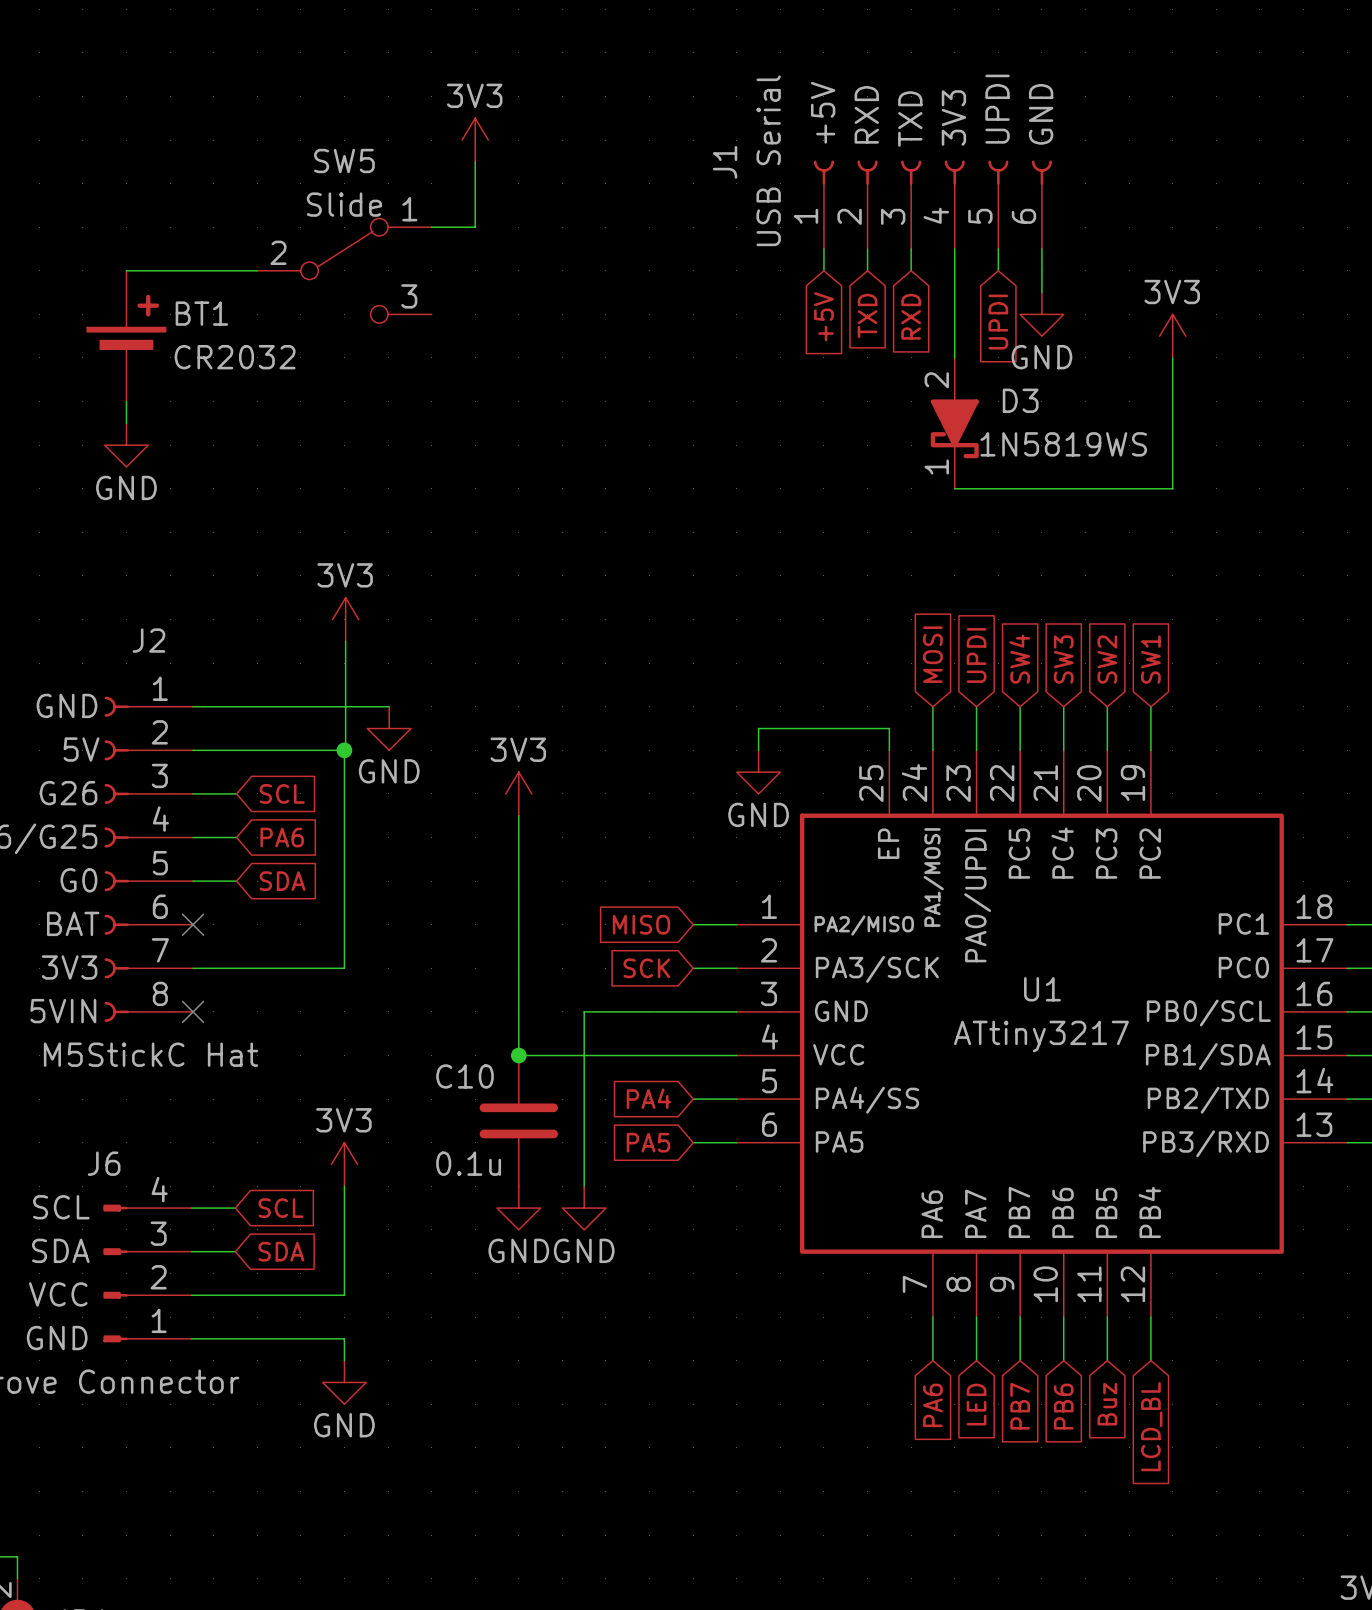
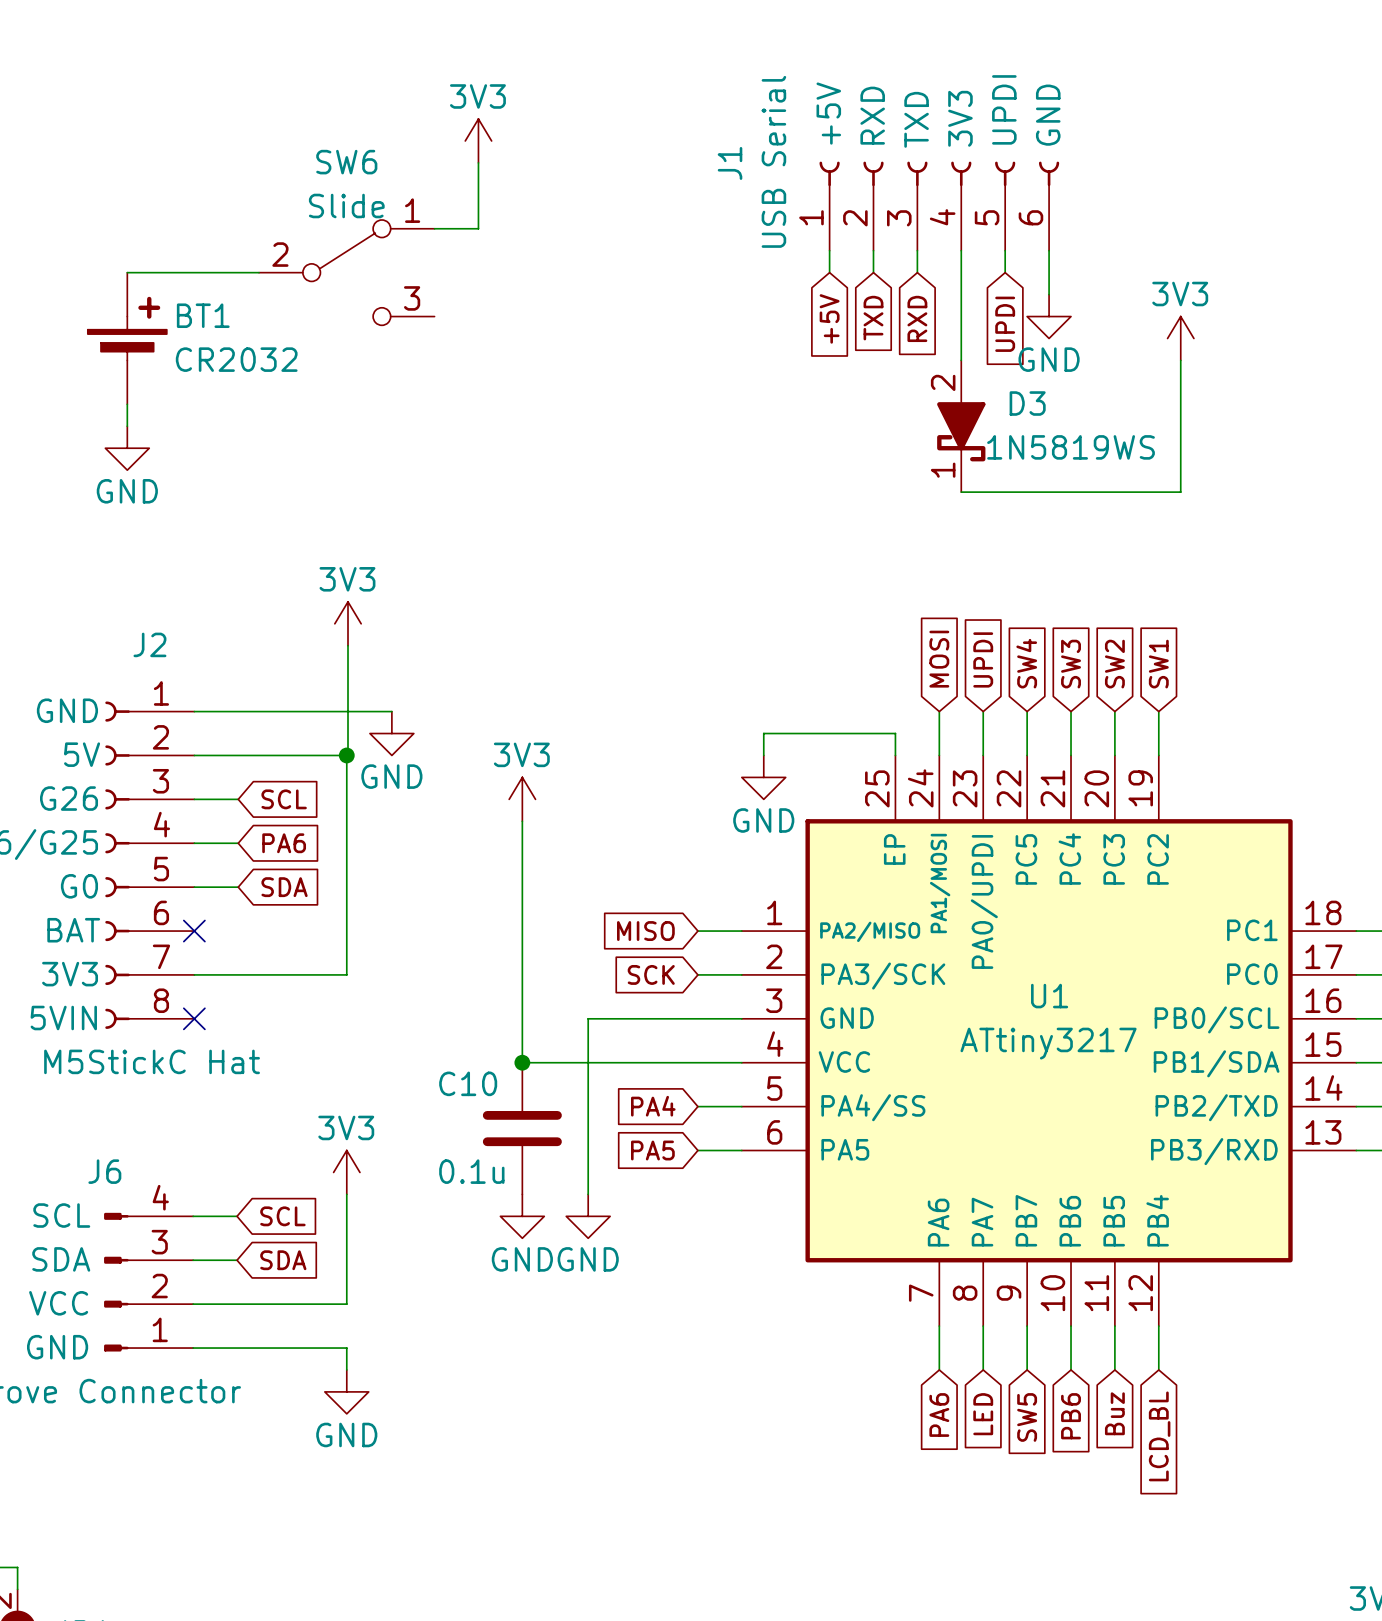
SW5 name: SW5 (344, 161) -> SW6 (346, 162)
global label: PB7 (1020, 1406) -> SW5 (1027, 1417)

